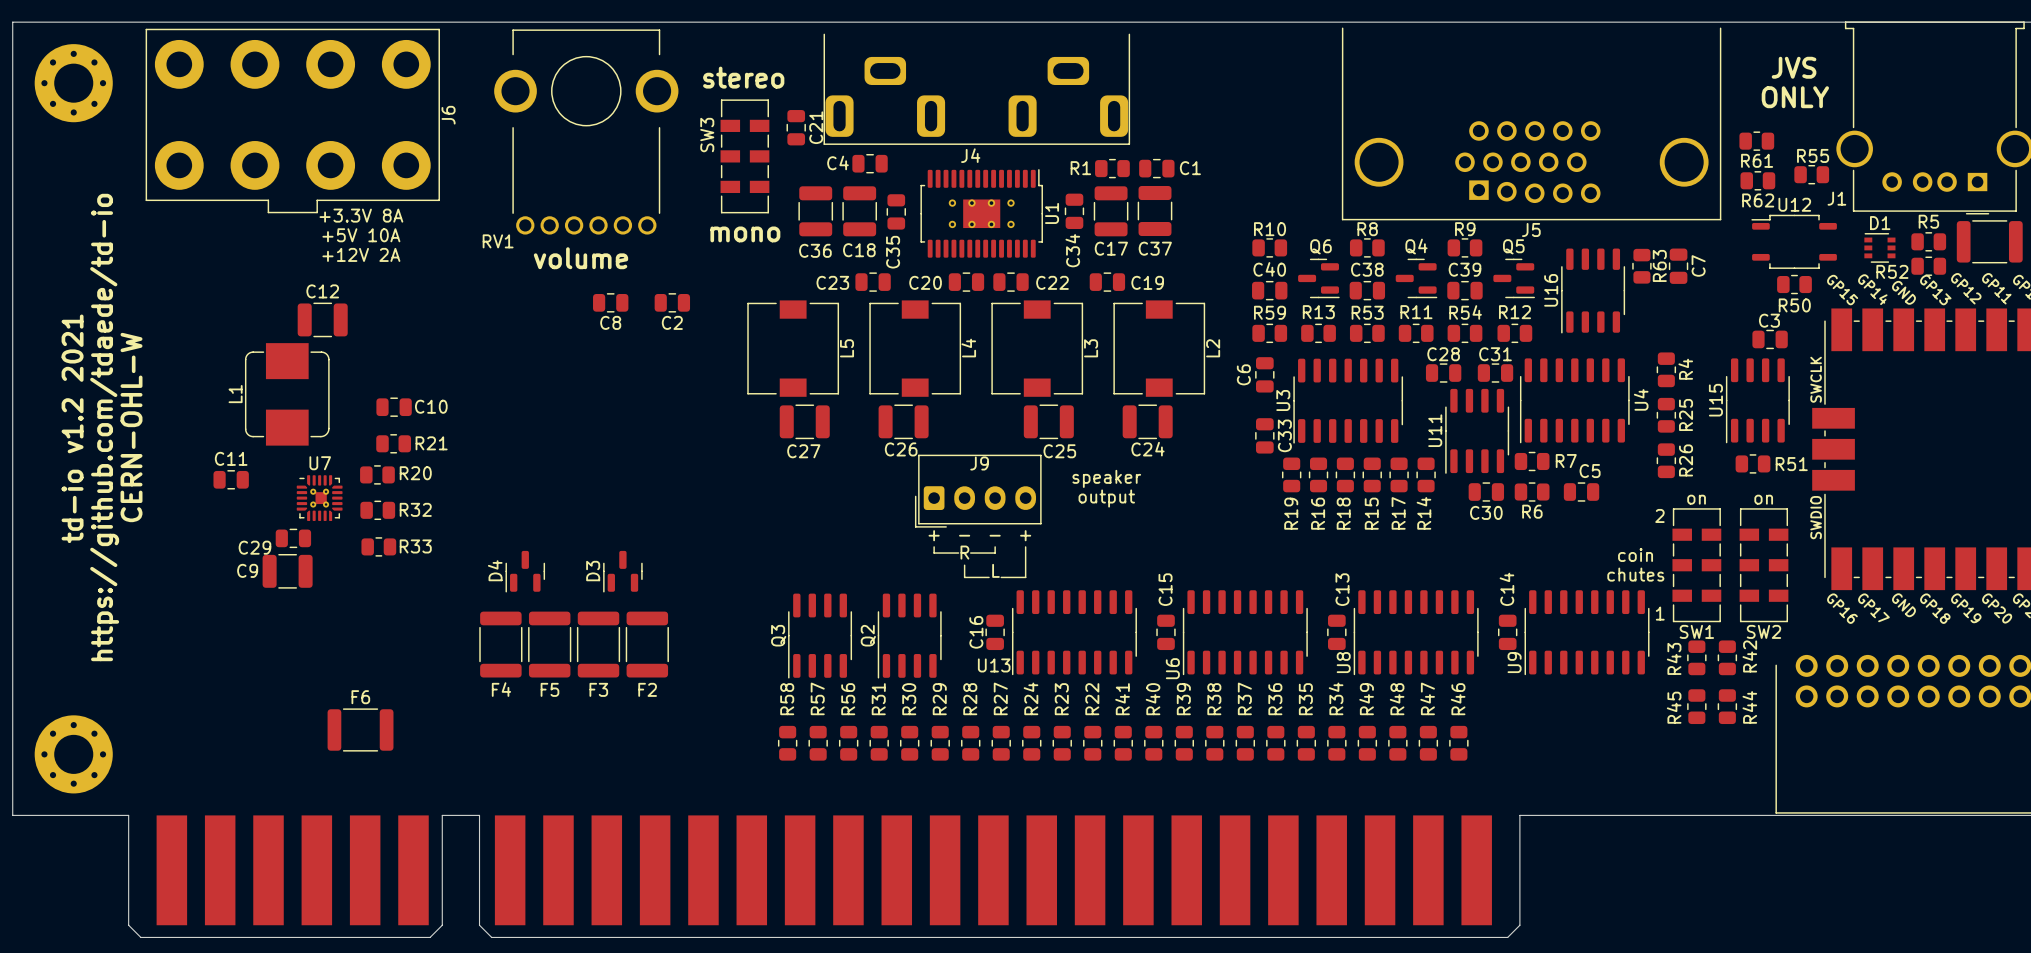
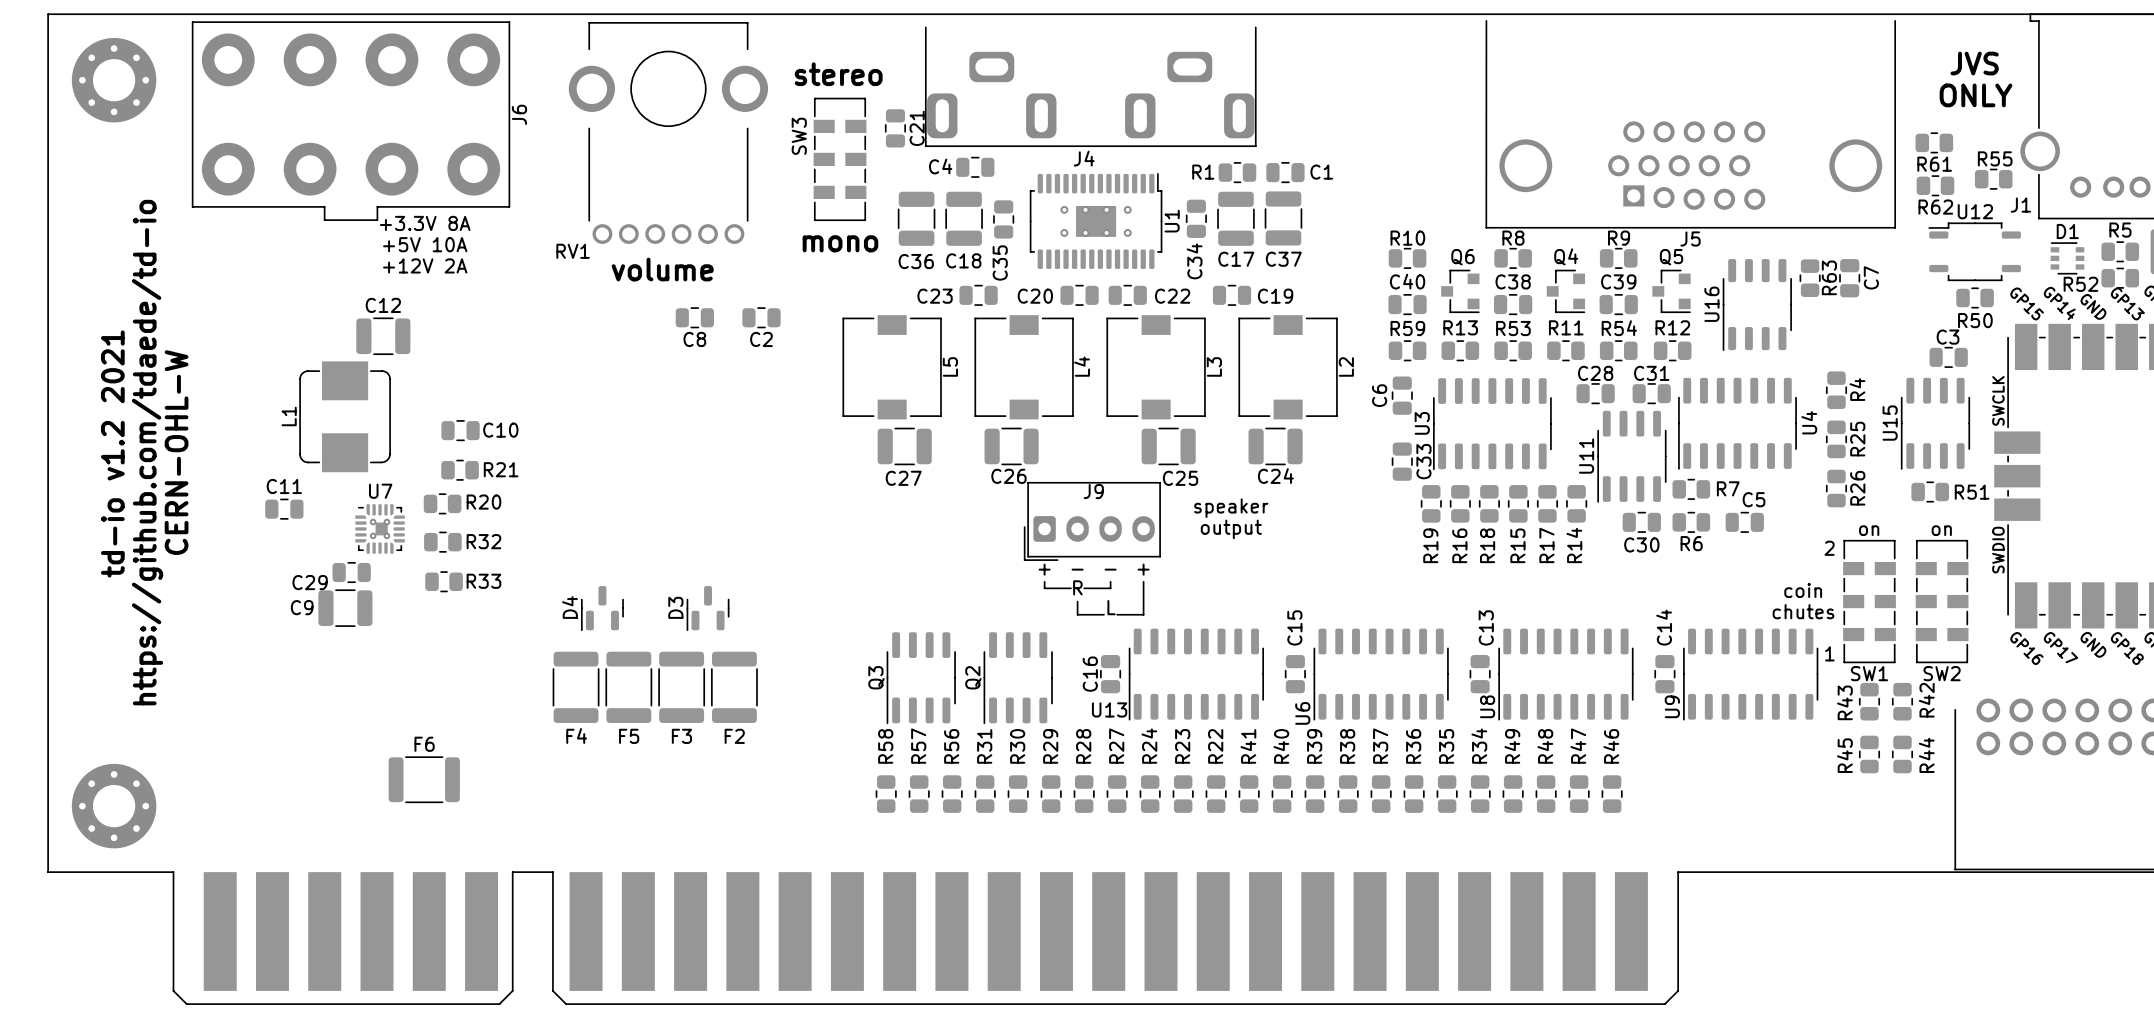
Q6 footprint: [1298, 258, 1340, 299] -> [1441, 269, 1480, 314]
Q4 footprint: [1395, 258, 1438, 299] -> [1546, 269, 1586, 314]
Q5 footprint: [1493, 258, 1535, 299] -> [1652, 269, 1691, 314]

